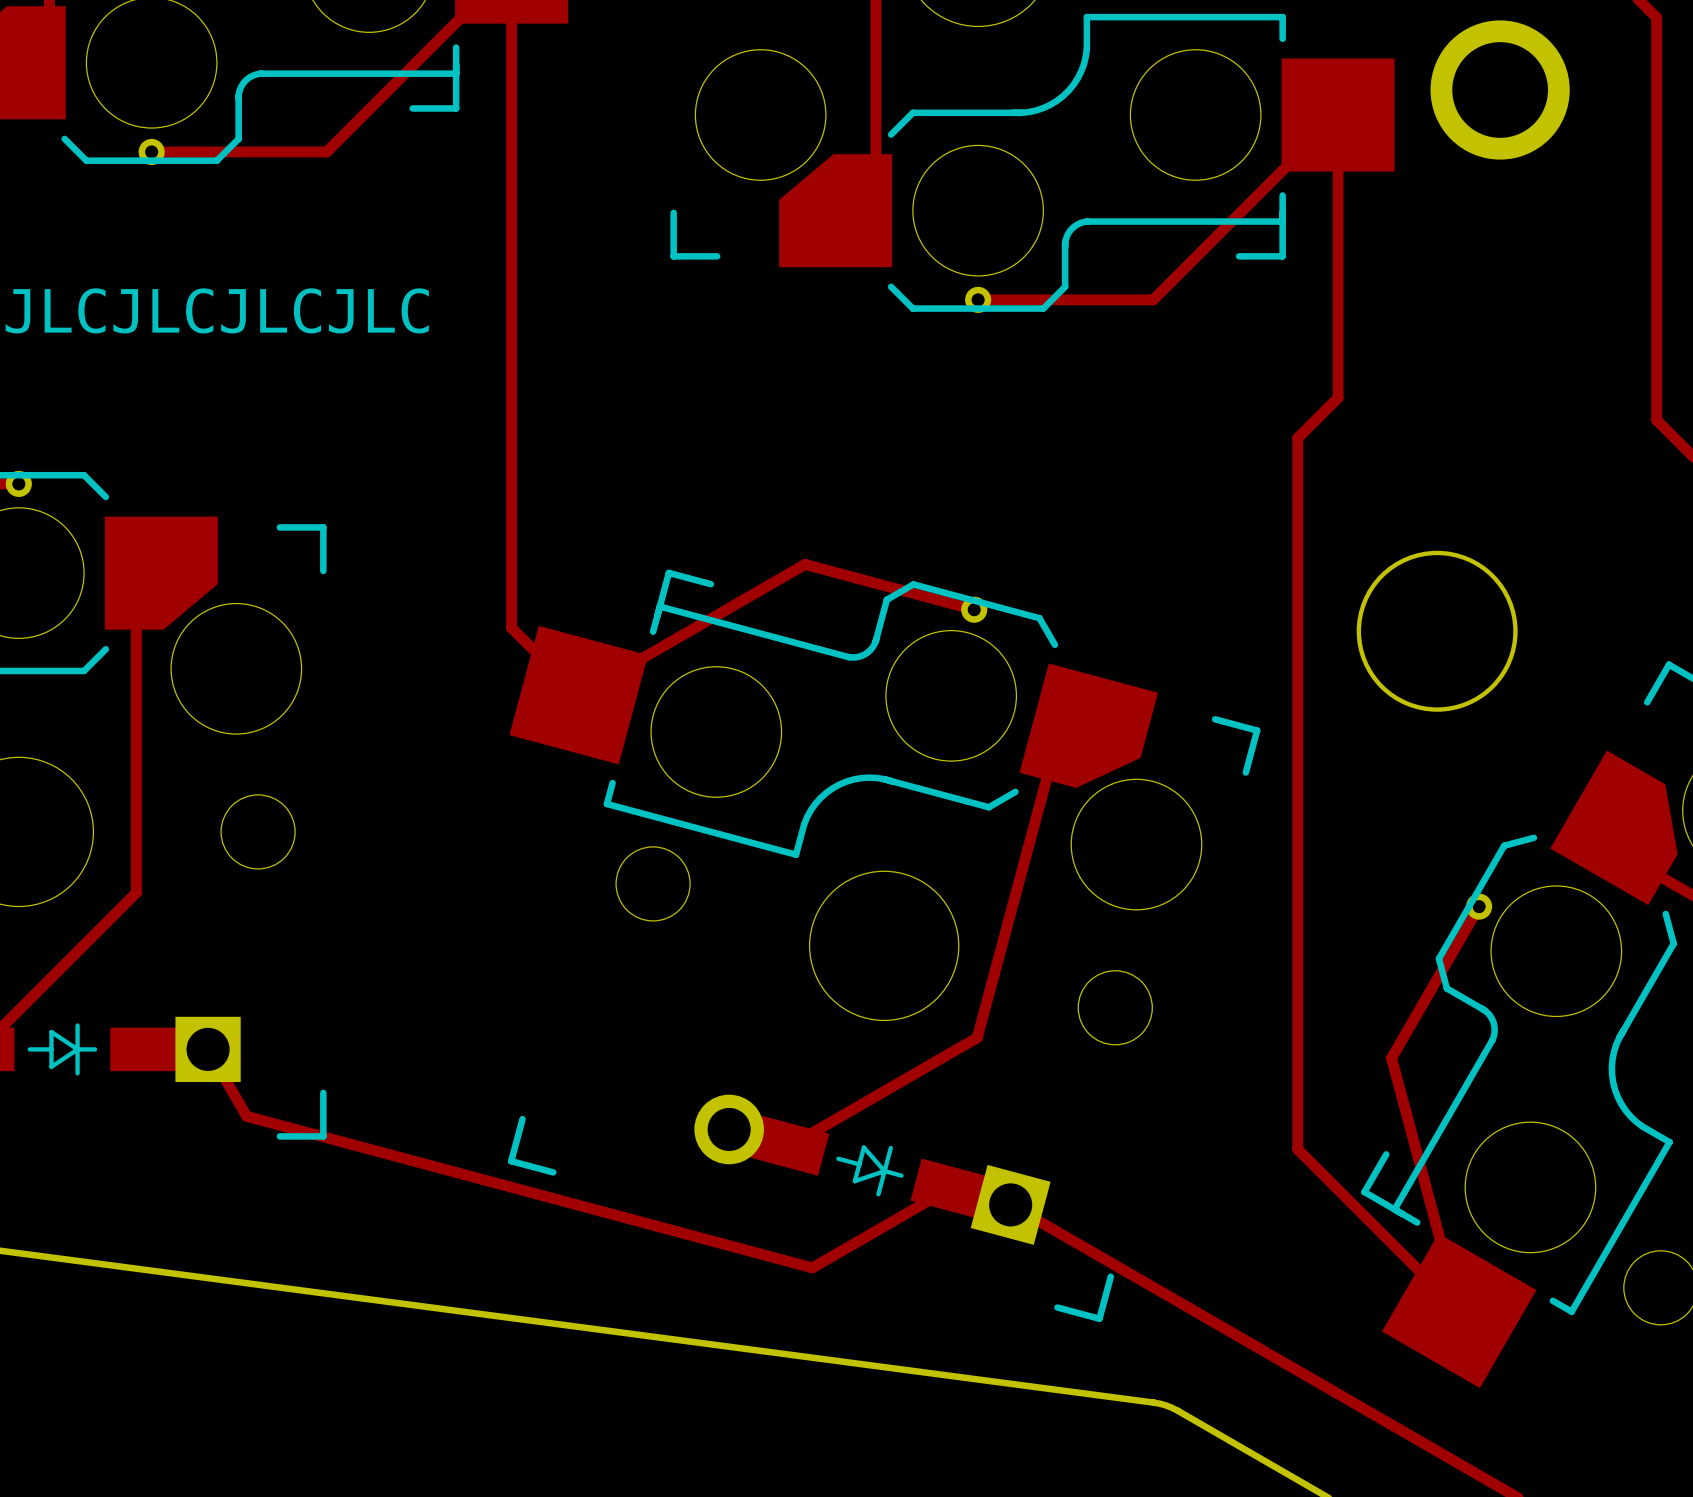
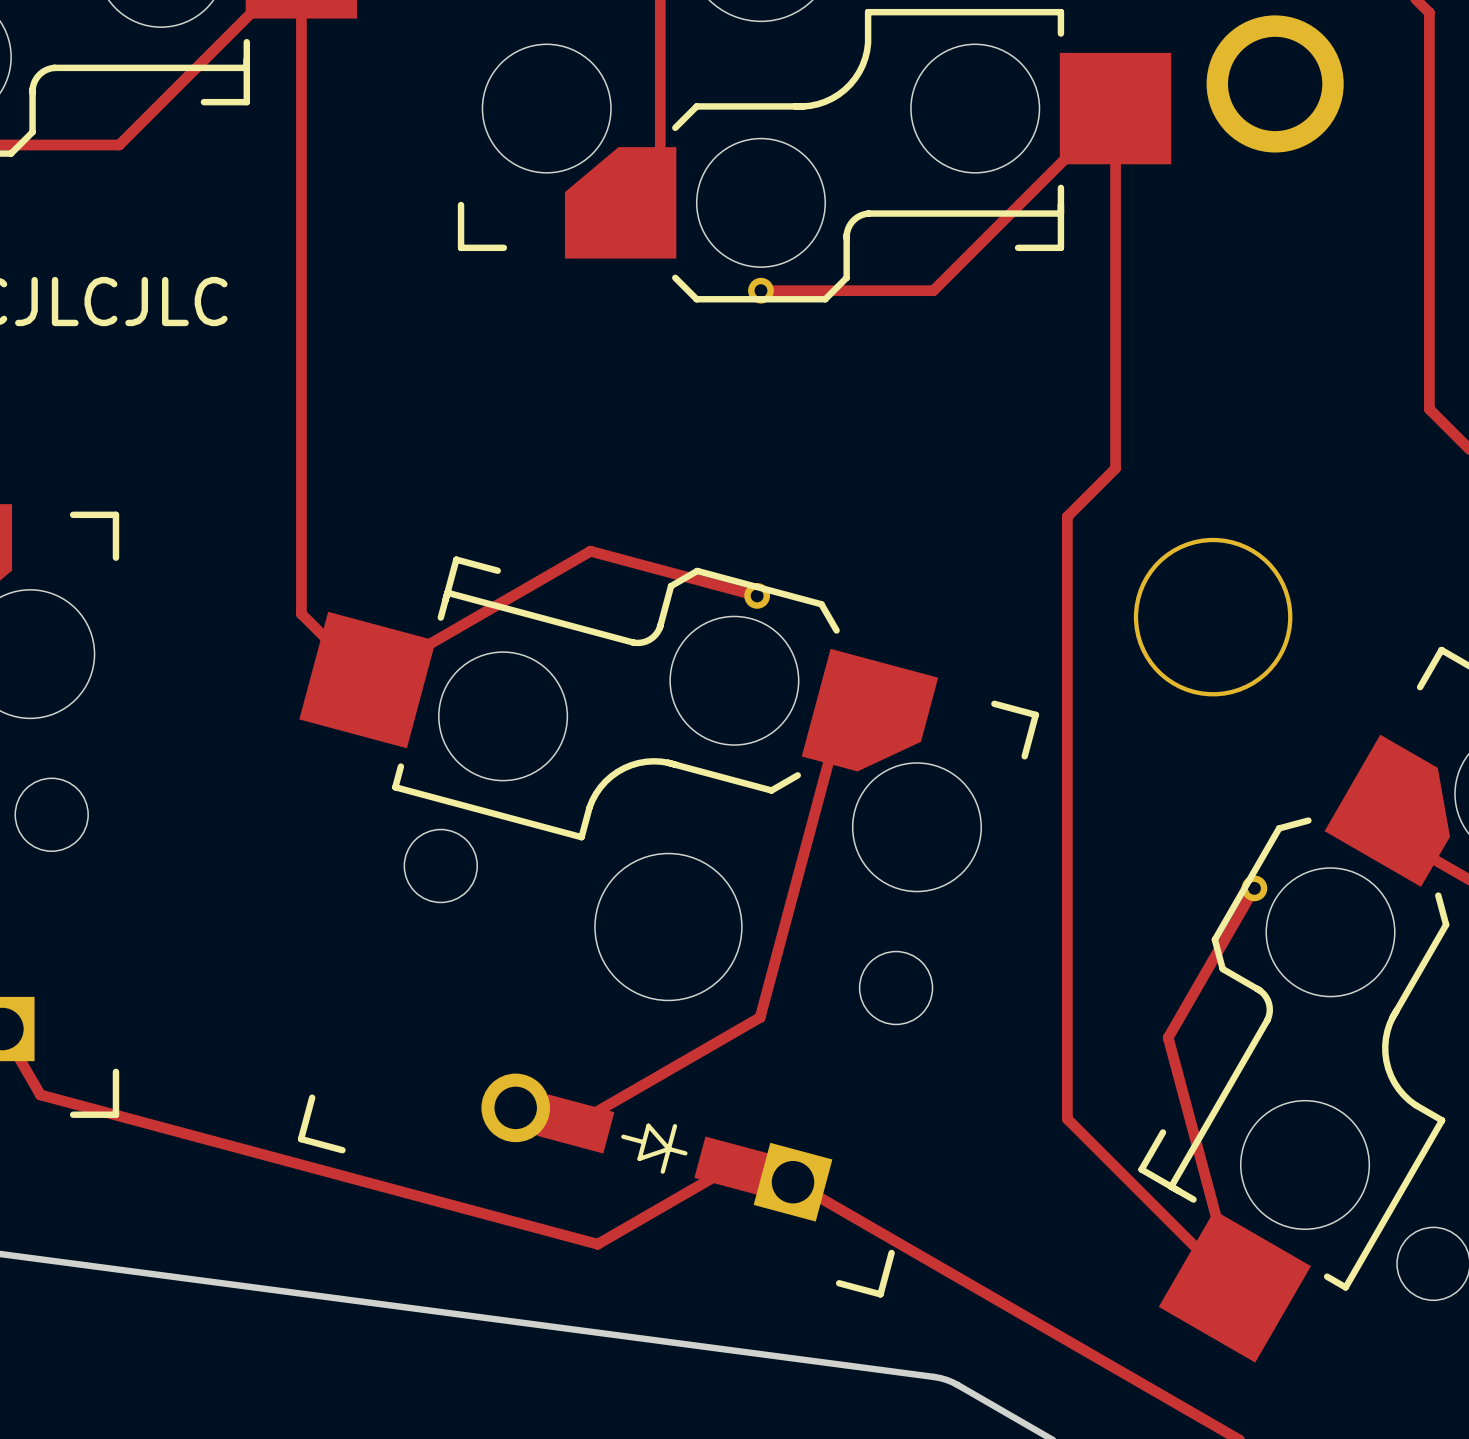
track: (1338, 397) (1297, 437) (1297, 1149) -> (1115, 387) (1115, 468) (1067, 516) (1067, 1118) (1075, 1127)

